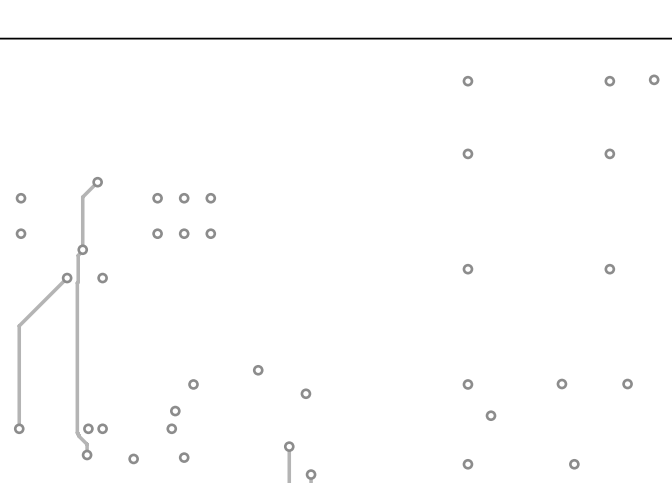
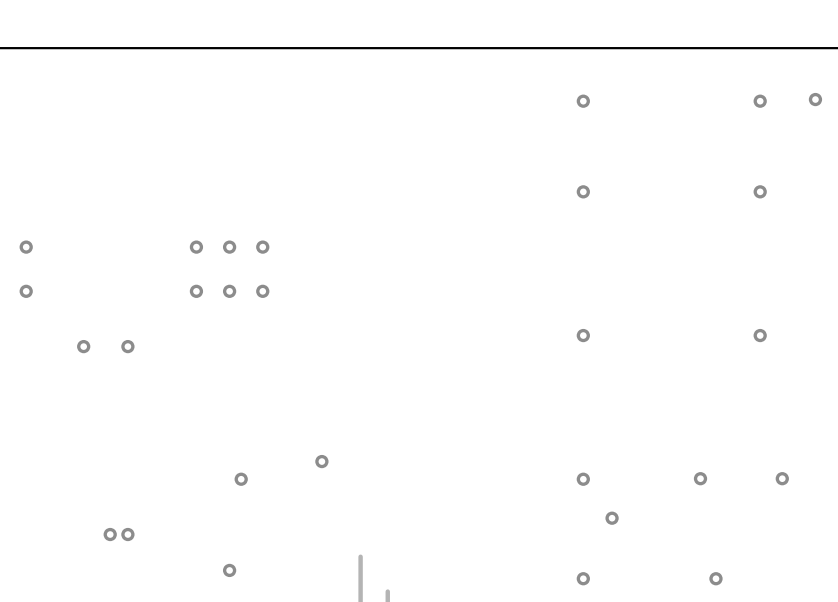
track: (97, 182) (82, 197) (82, 249) -> none
via: (97, 182) -> none
via: (82, 249) -> none
track: (79, 253) (78, 255) (77, 282) (77, 432) (87, 444) (87, 455) -> none
track: (67, 278) (19, 325) (19, 428) -> none
via: (305, 393) -> none
via: (175, 411) -> none
via: (19, 428) -> none
via: (171, 428) -> none
via: (289, 446) -> none
via: (87, 455) -> none
via: (133, 458) -> none
via: (311, 474) -> none

